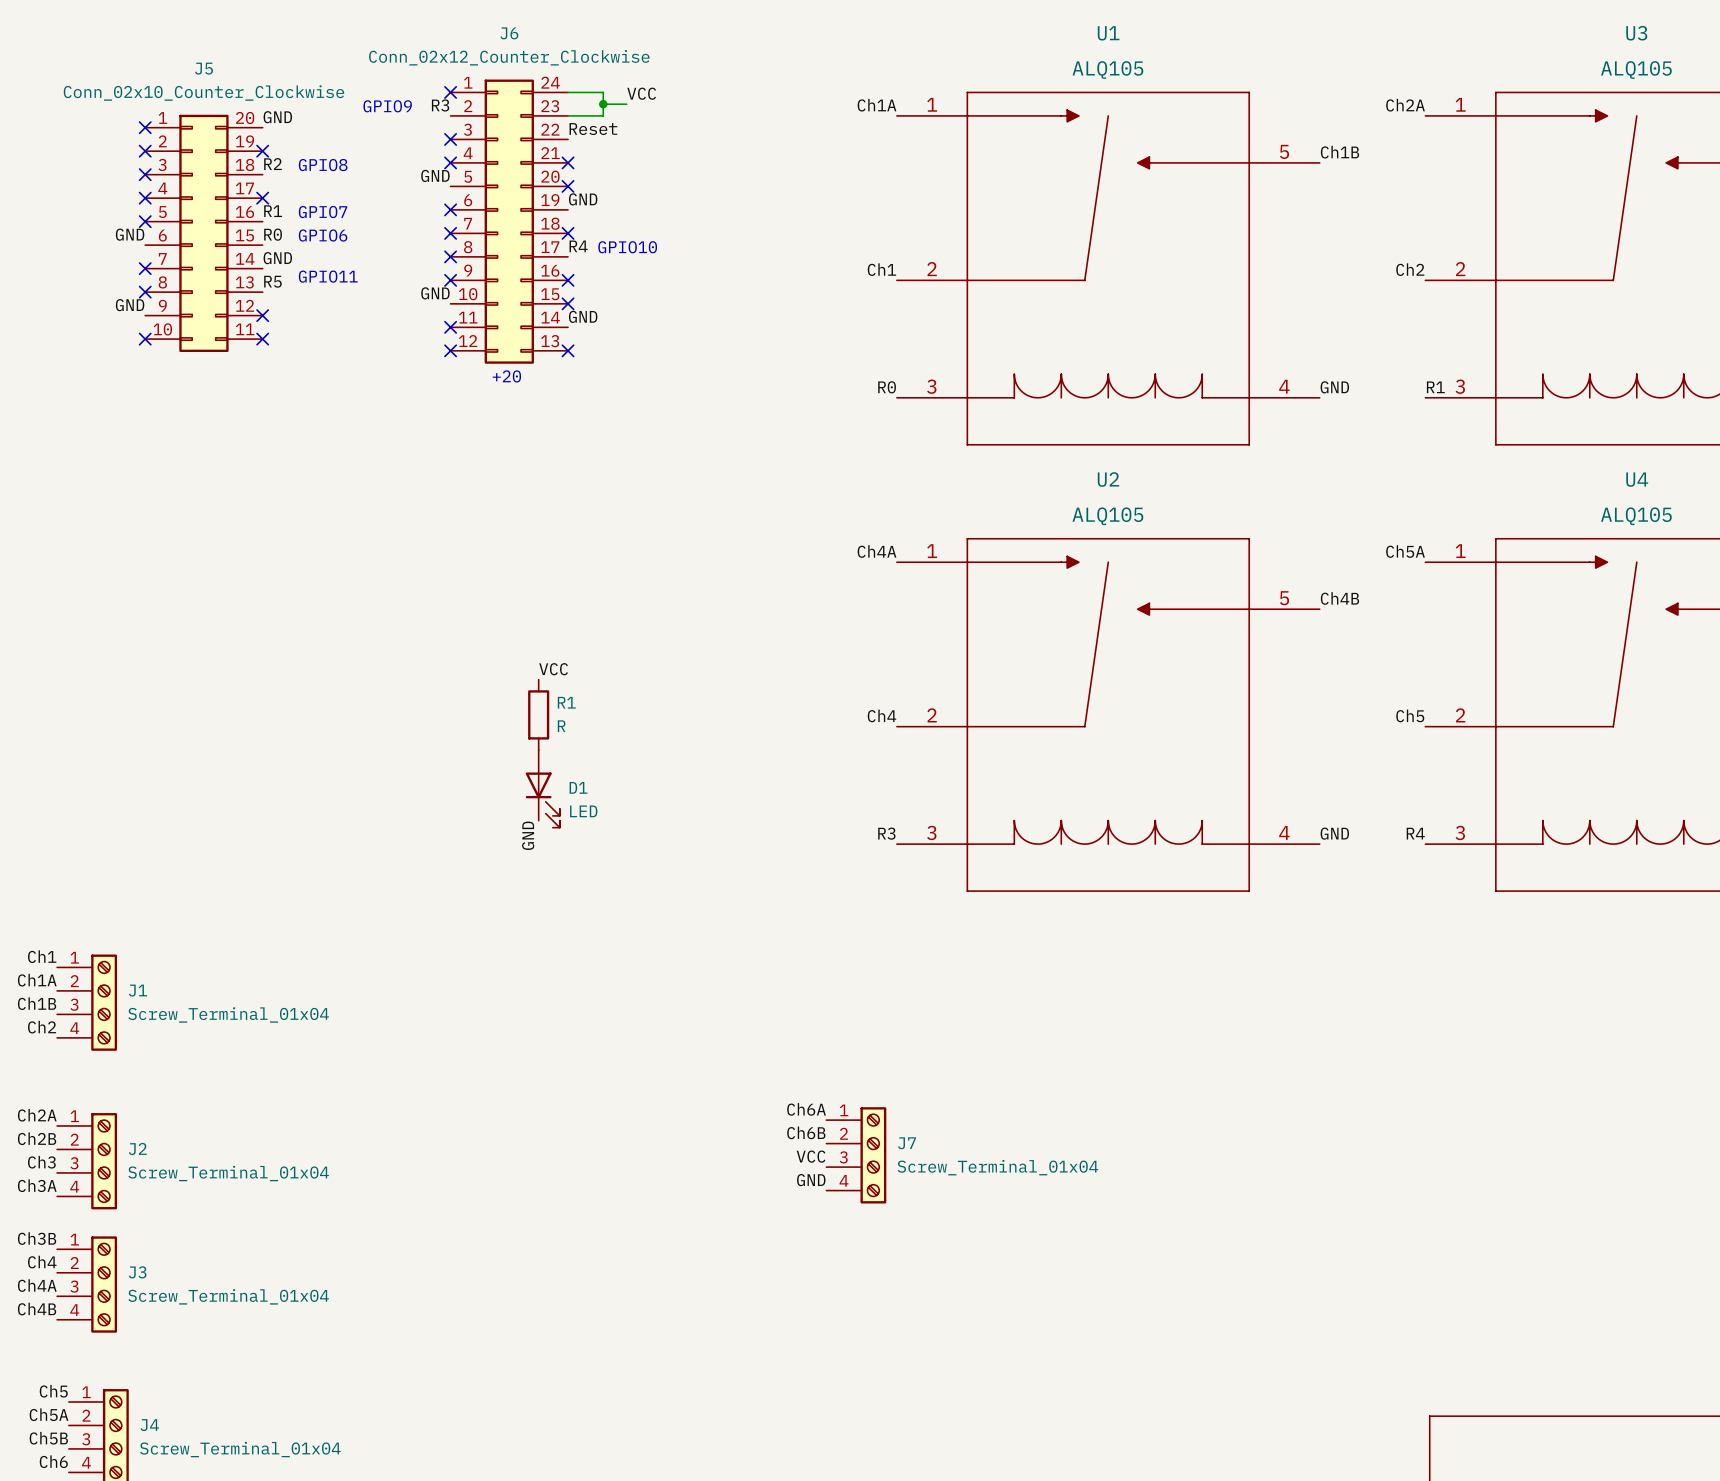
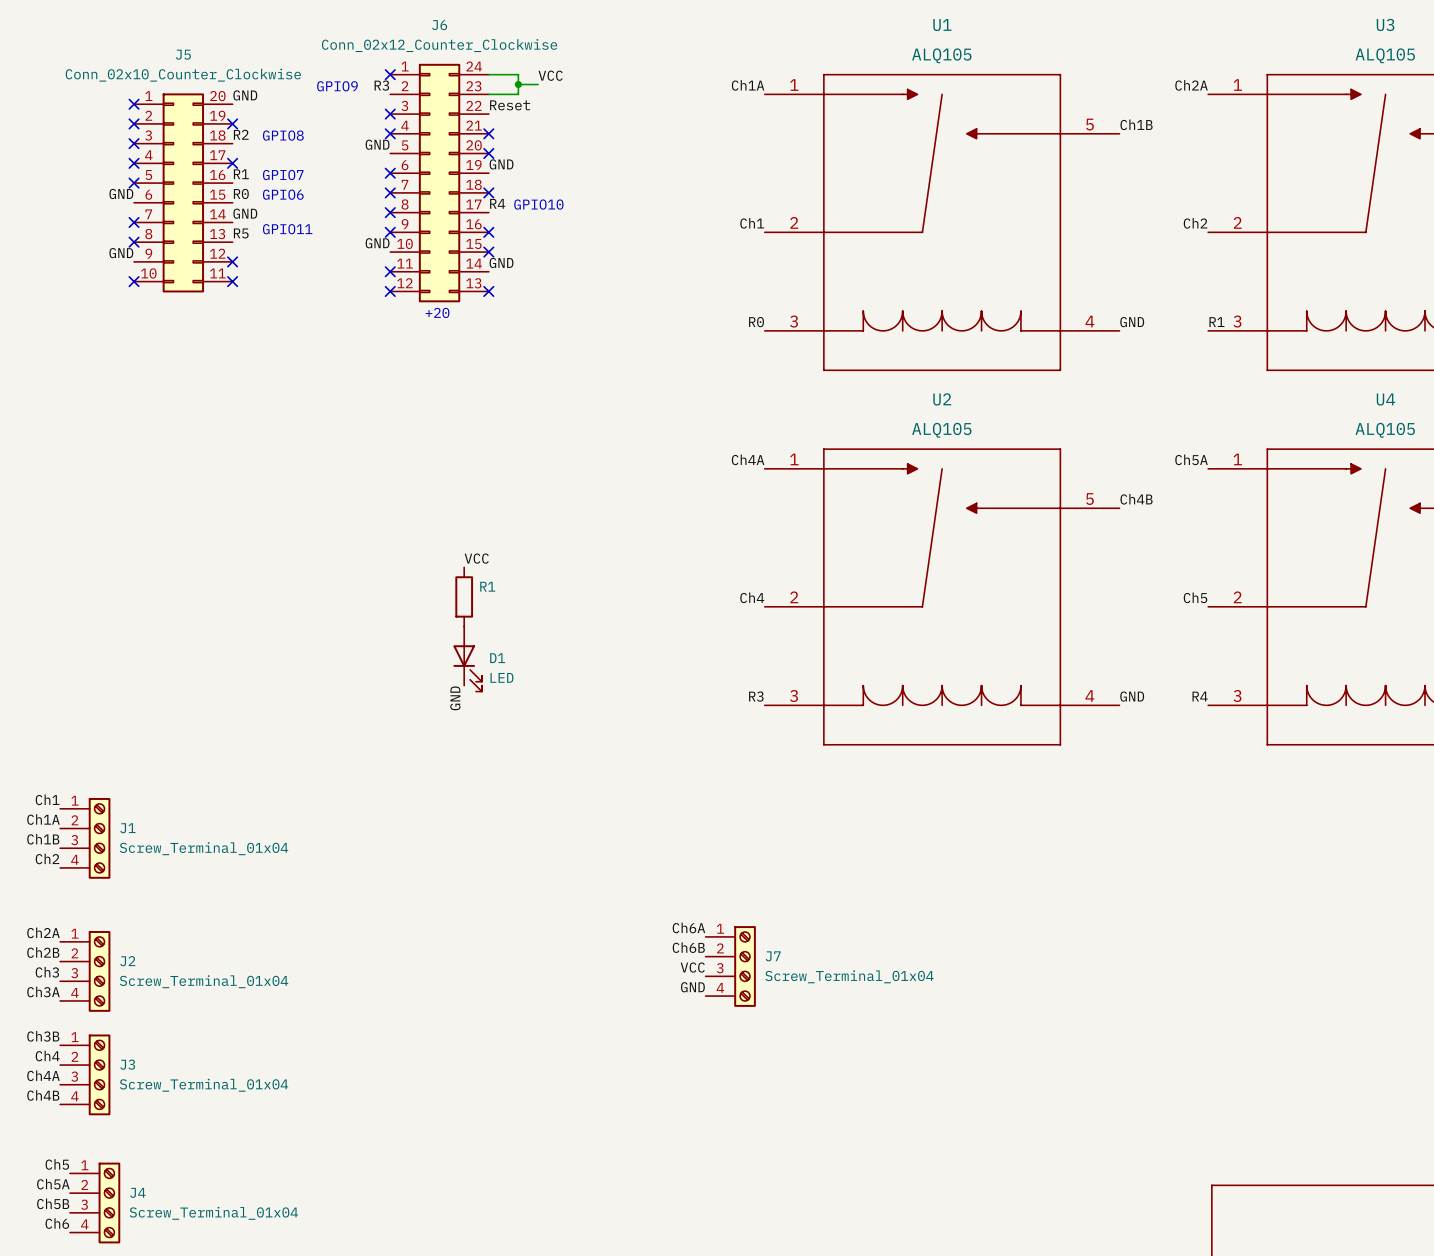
R1 value: R (561, 726) -> none

